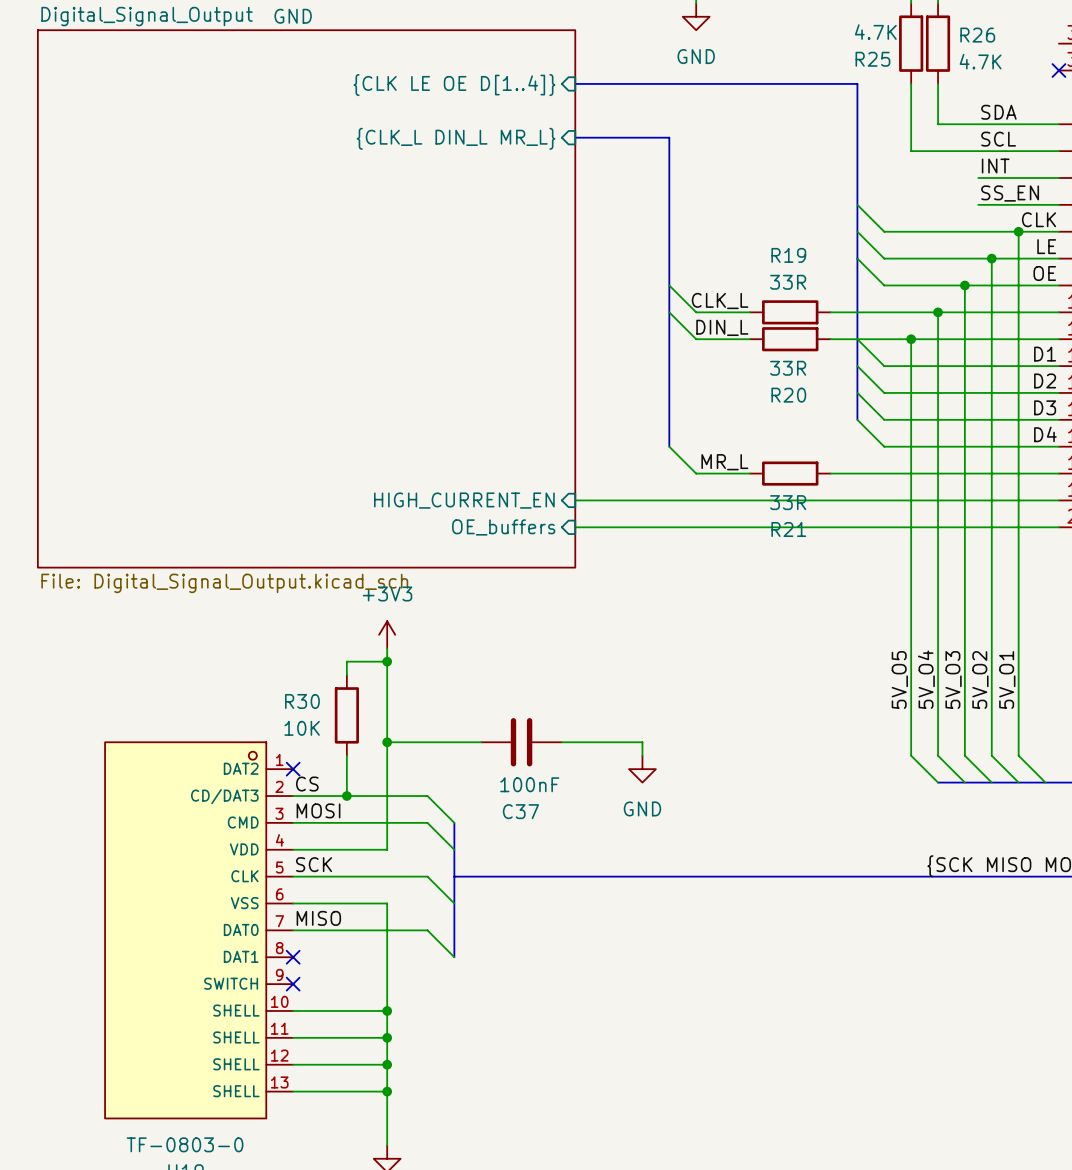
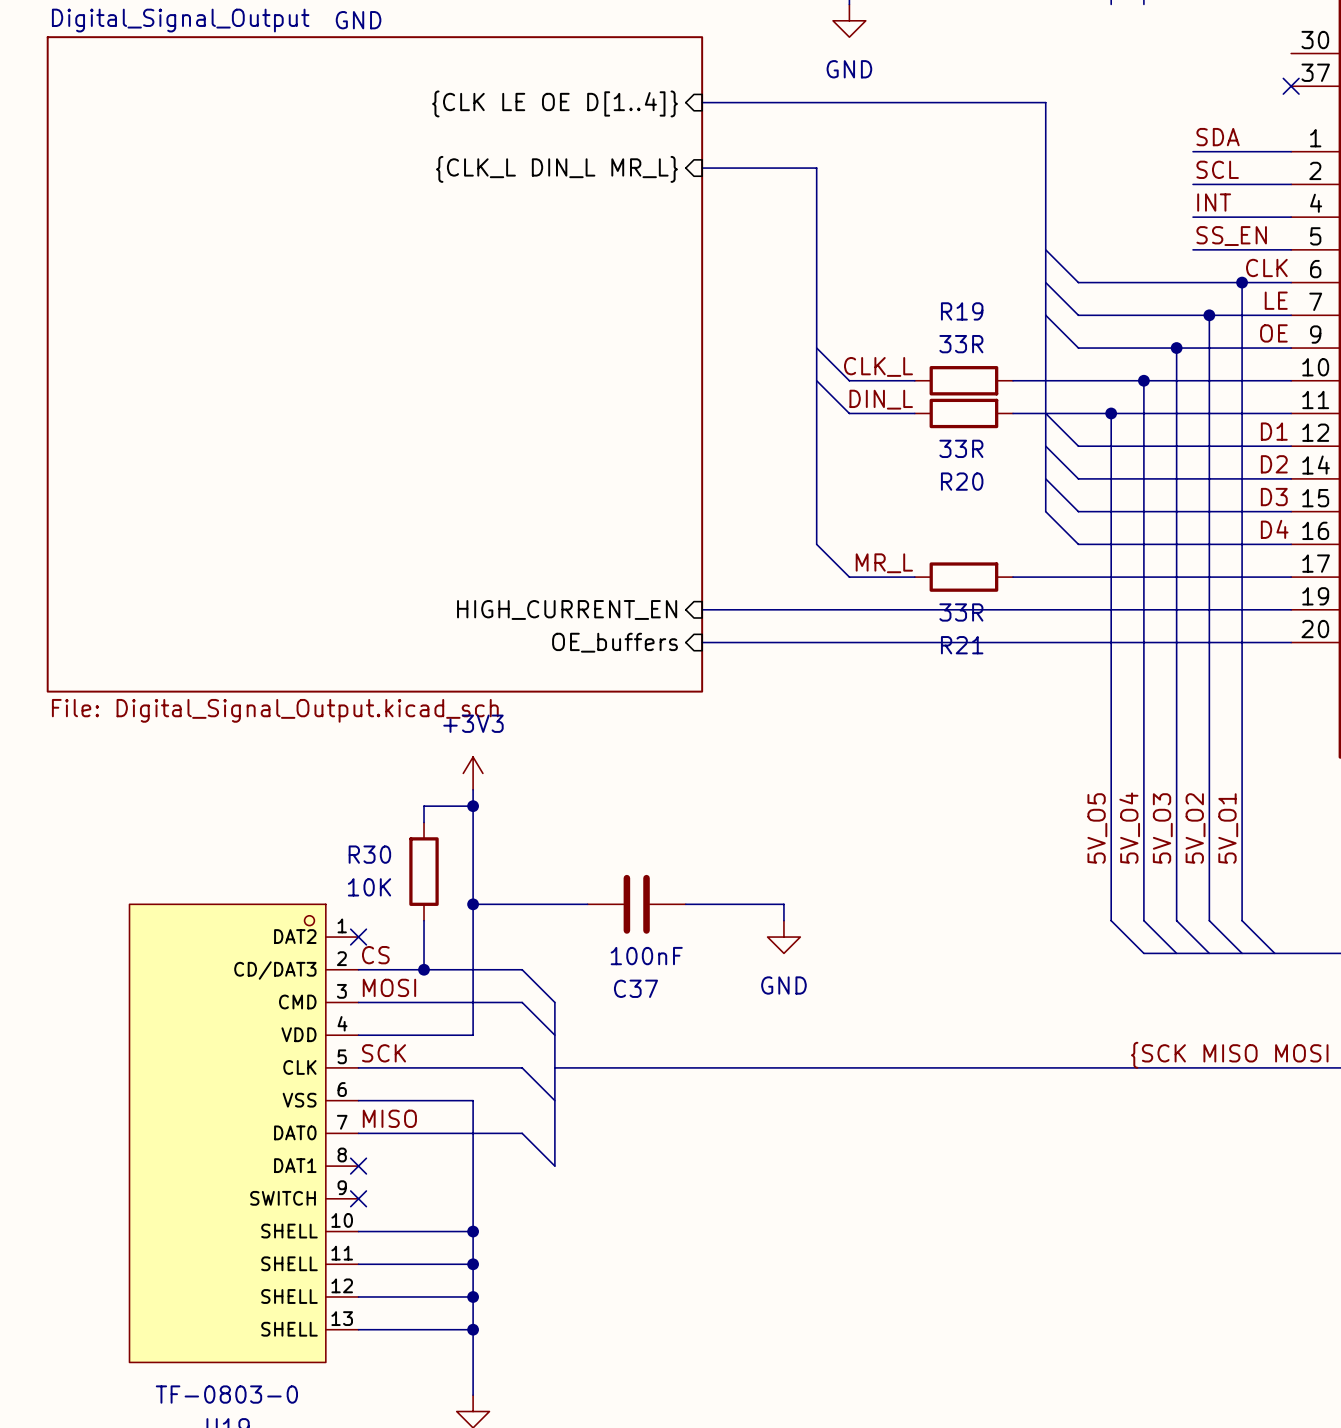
R25: 4.7K (911, 43) -> none
R26: 4.7K (938, 43) -> none
wire: (911, 83) (911, 151) (978, 151) -> none
wire: (938, 83) (938, 124) (978, 124) -> none

